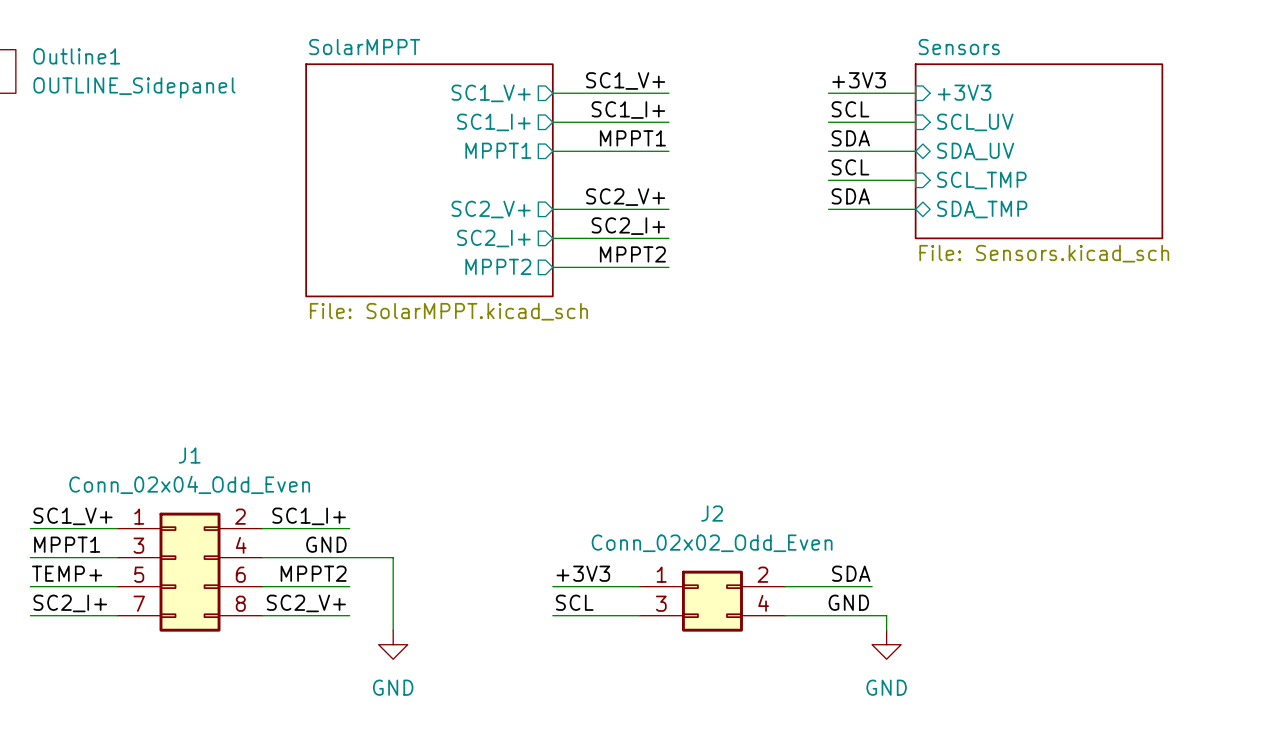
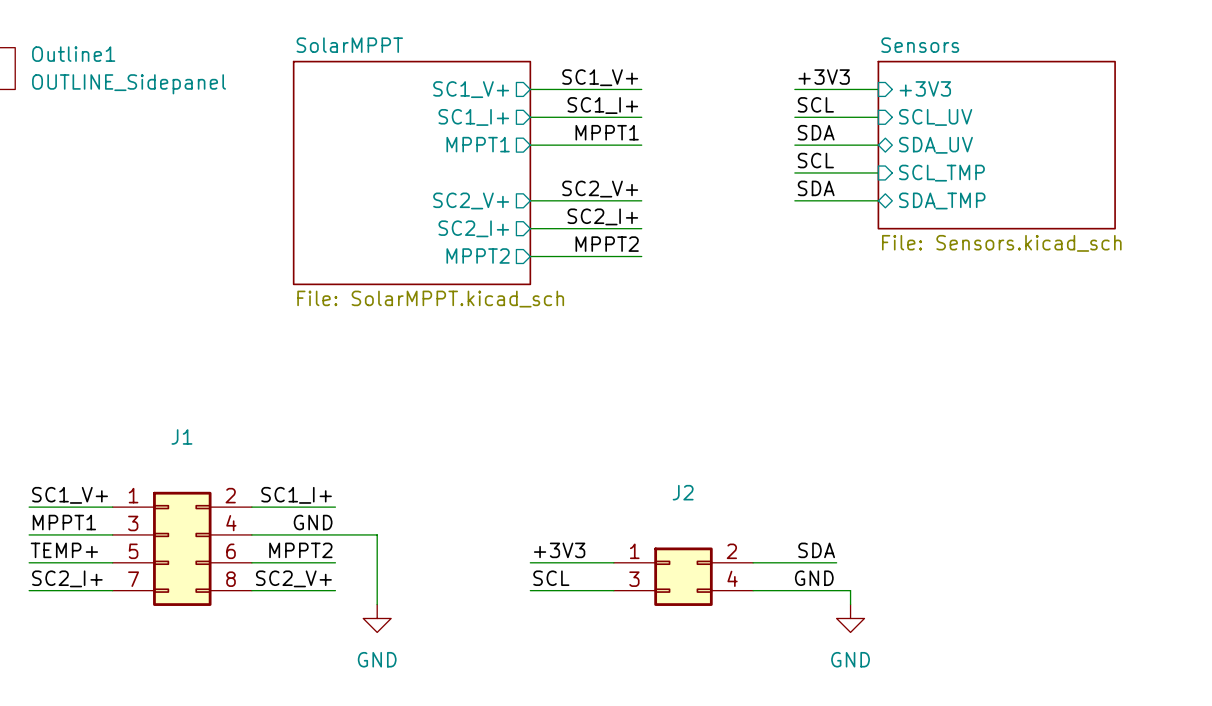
J1 value: Conn_02x04_Odd_Even (189, 484) -> none
J2 value: Conn_02x02_Odd_Even (712, 543) -> none

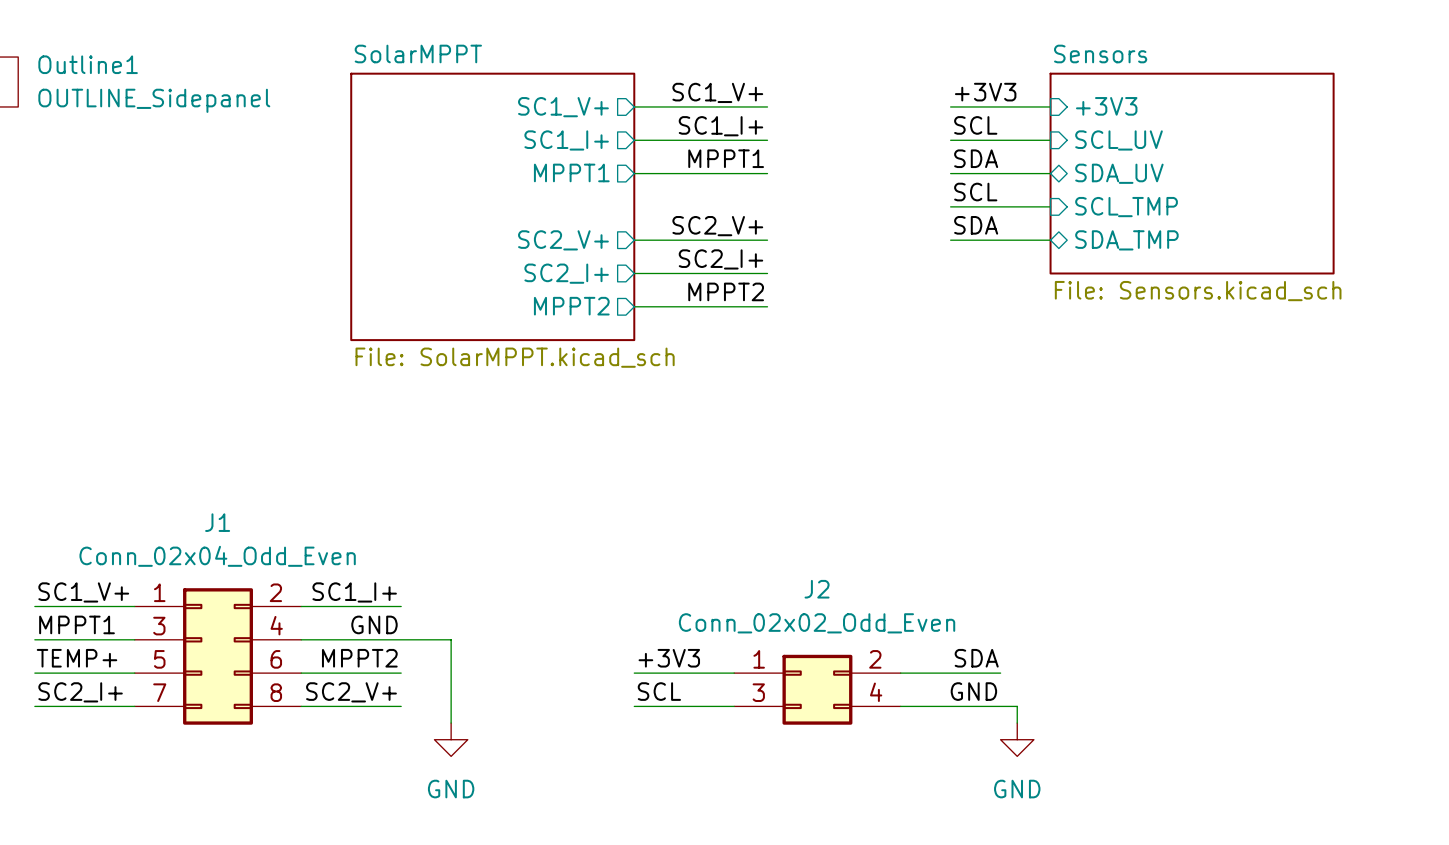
J1 value: none -> Conn_02x04_Odd_Even (217, 556)
J2 value: none -> Conn_02x02_Odd_Even (817, 623)

